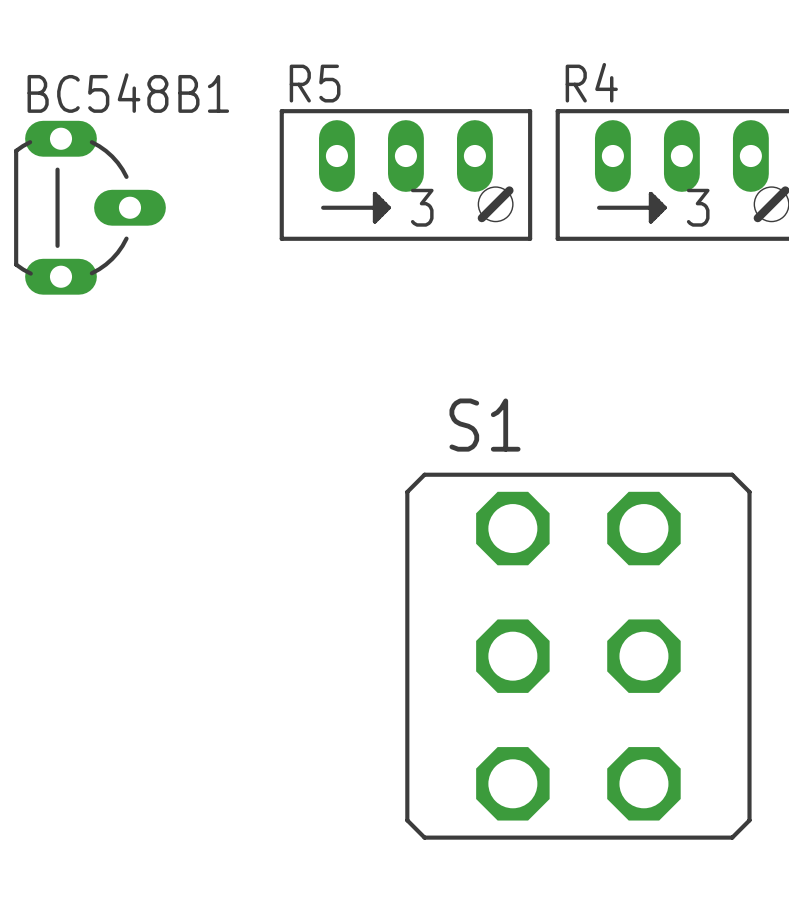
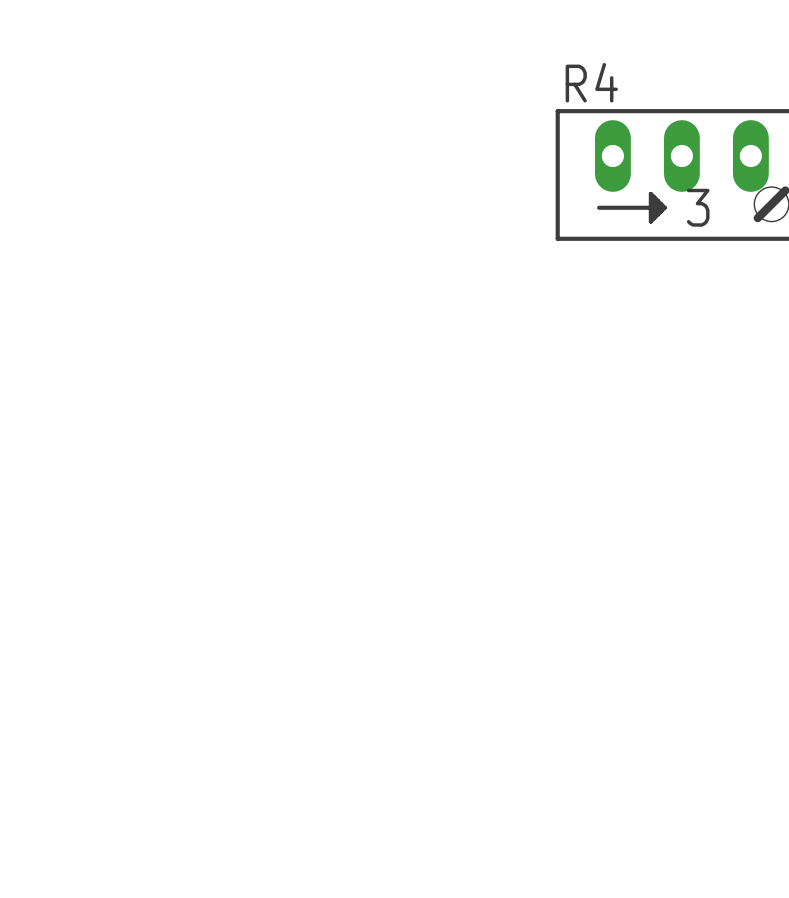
R5: (405, 174) -> none
BC548B1: (89, 207) -> none
S1: (578, 656) -> none

